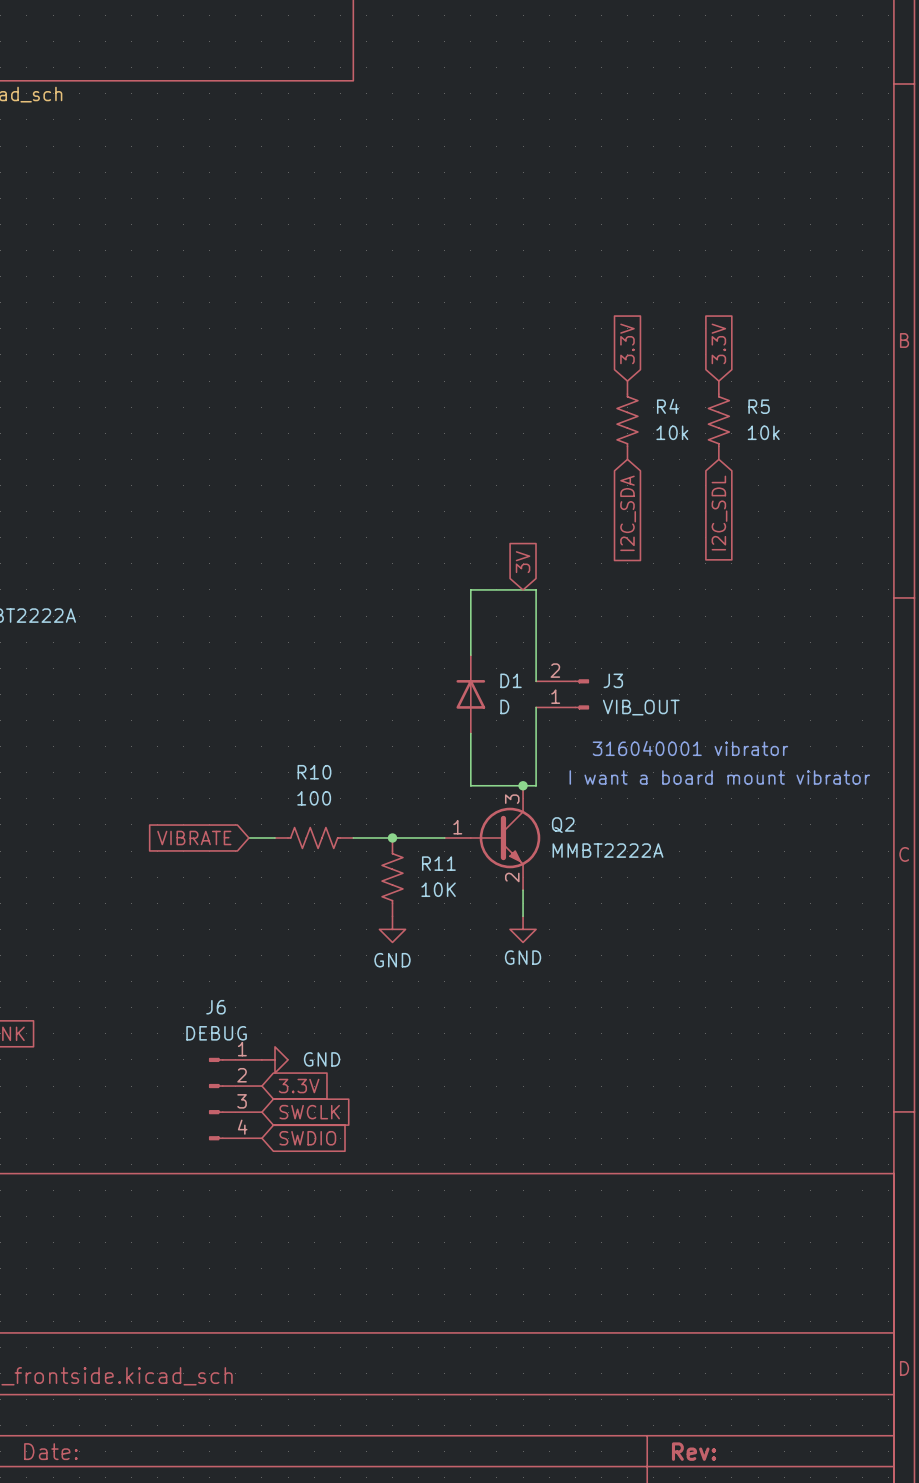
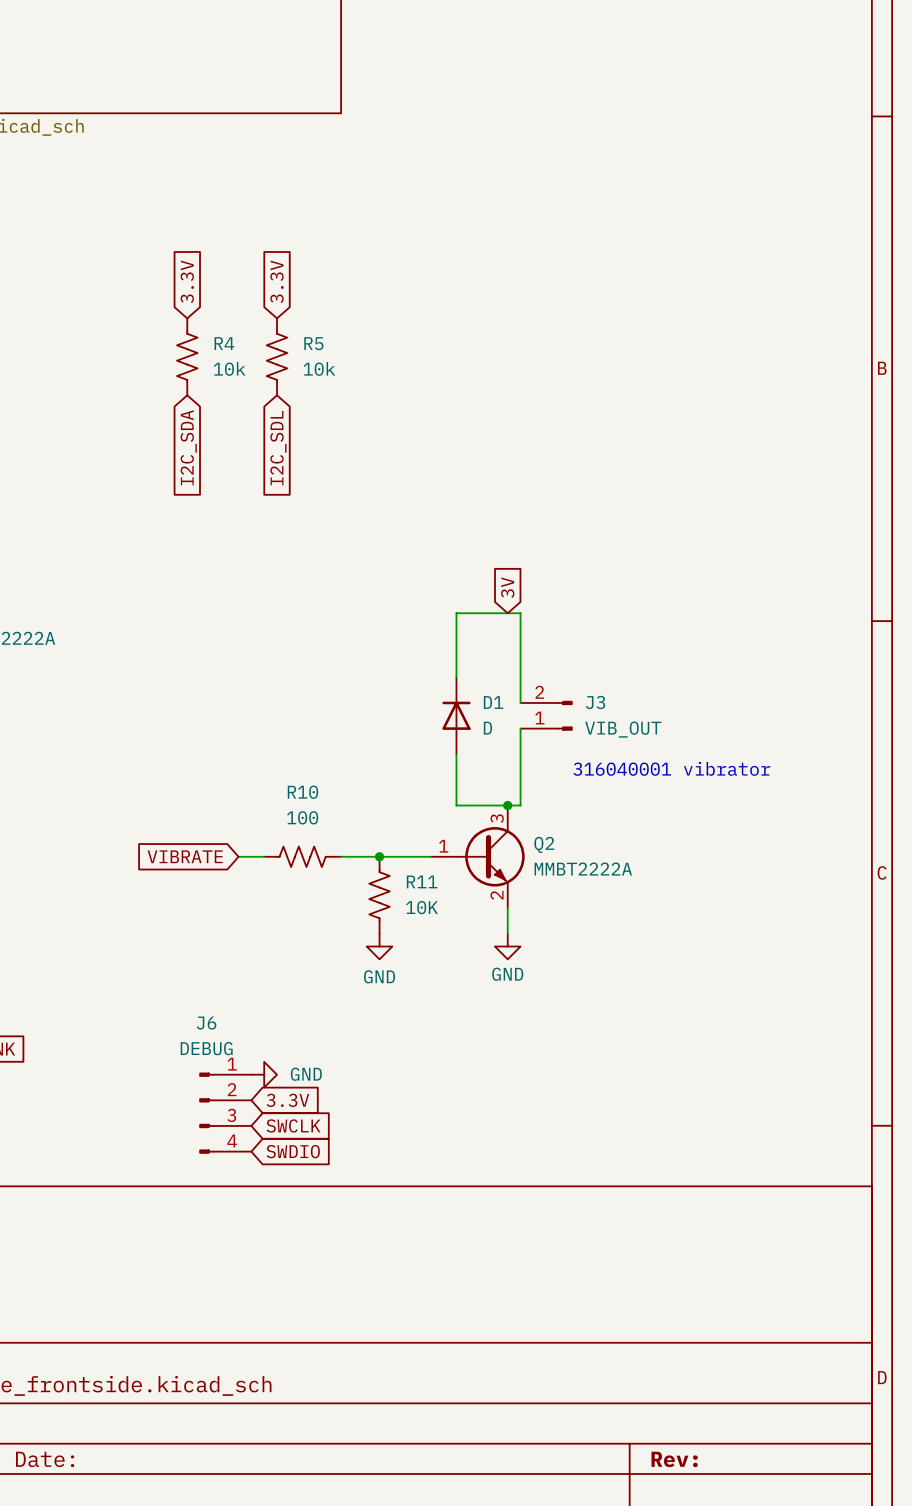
global label: none -> 3.3V (187, 281)
global label: none -> 3.3V (277, 281)
global label: 3.3V (627, 343) -> none
global label: 3.3V (718, 343) -> none
R4 position: (627, 420) -> (187, 356)
R5 position: (718, 420) -> (277, 356)
global label: none -> I2C_SDA (188, 447)
global label: none -> I2C_SDL (278, 448)
global label: I2C_SDA (628, 513) -> none
global label: I2C_SDL (719, 513) -> none
text: I want a board mount vibrator (719, 777) -> none

